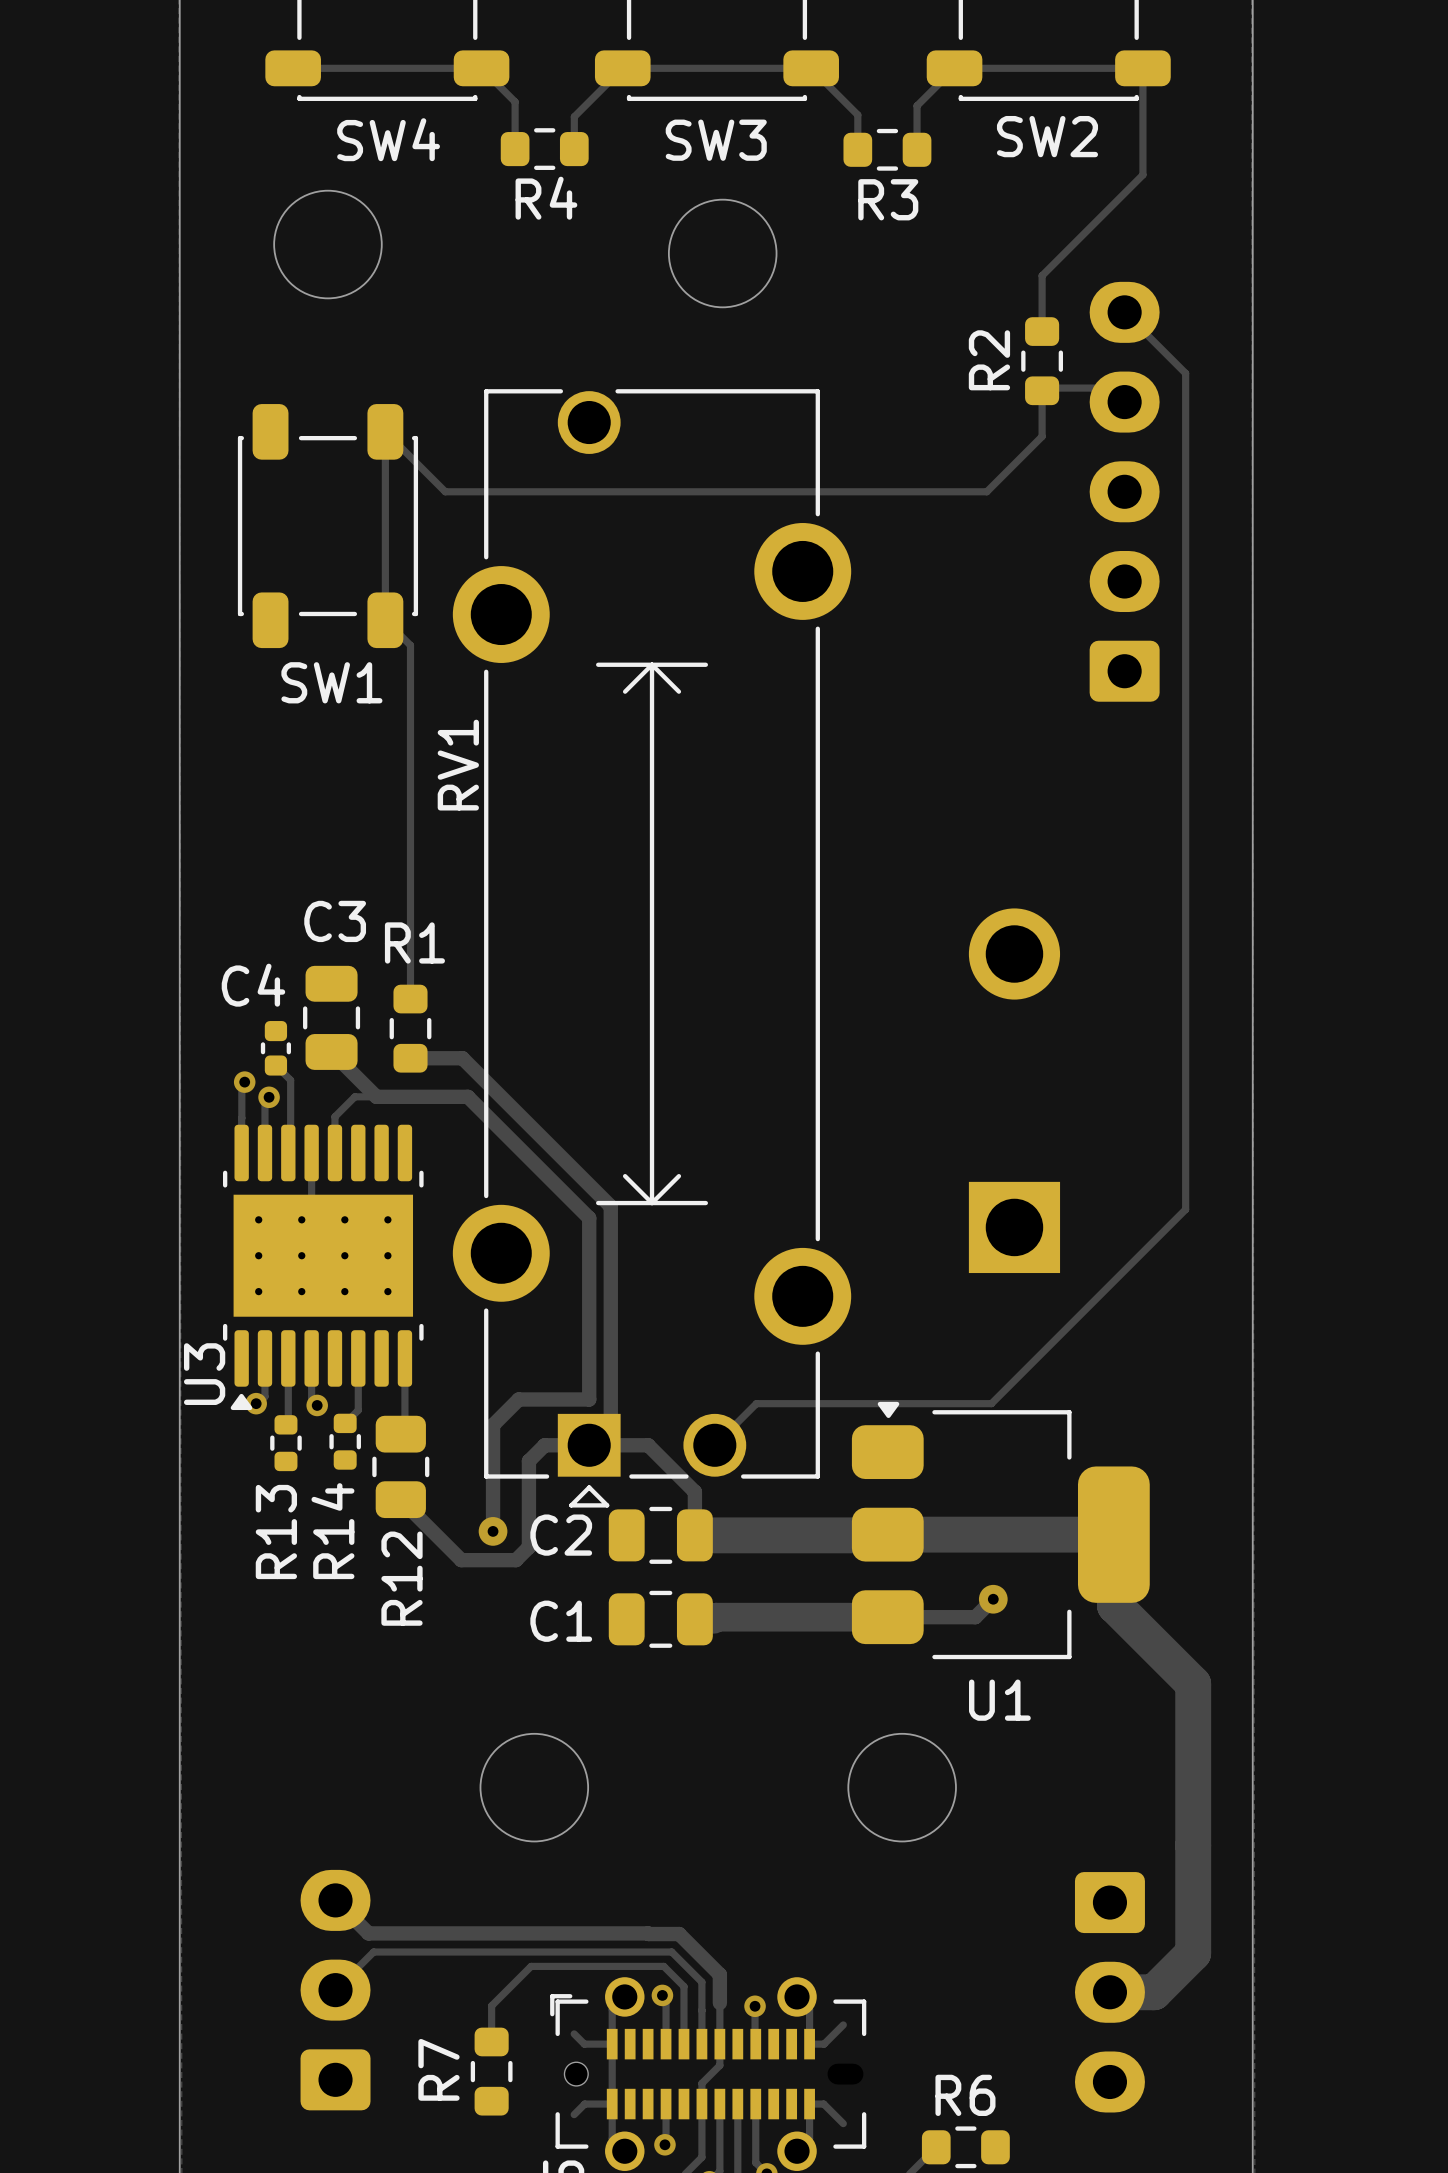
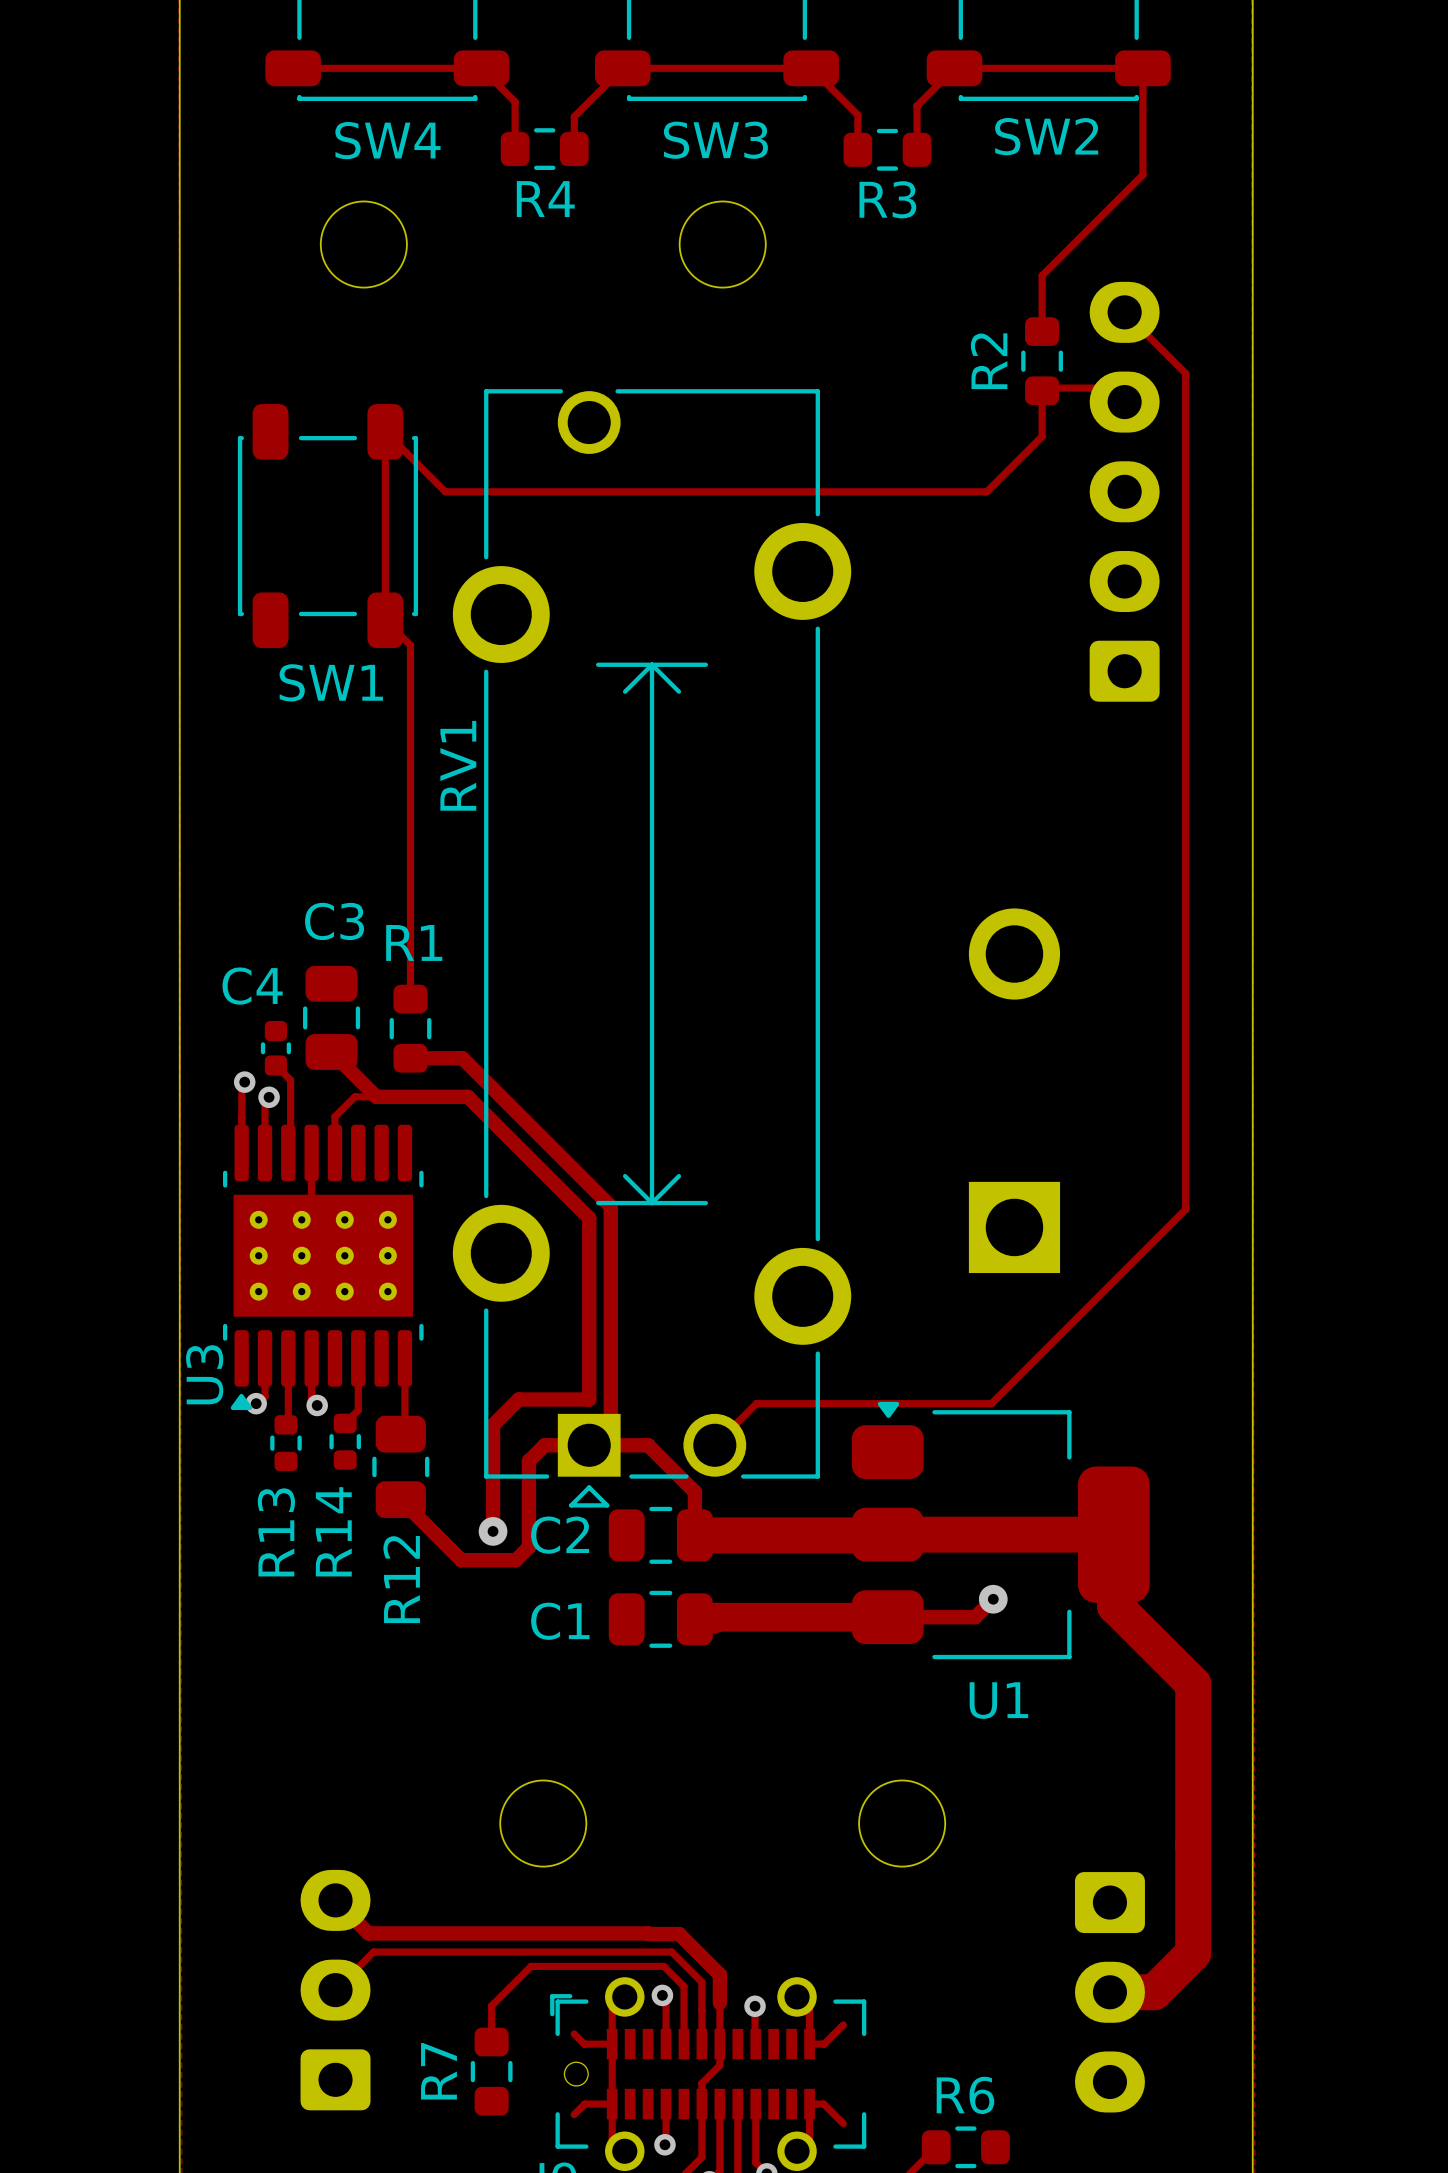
round board edge size: [273, 189, 383, 300] -> [319, 200, 408, 289]
round board edge size: [667, 198, 778, 309] -> [678, 200, 767, 289]
round board edge: [479, 1732, 590, 1843] -> none
round board edge size: [847, 1732, 957, 1843] -> [858, 1779, 947, 1868]
round board edge: none -> [499, 1779, 588, 1868]

